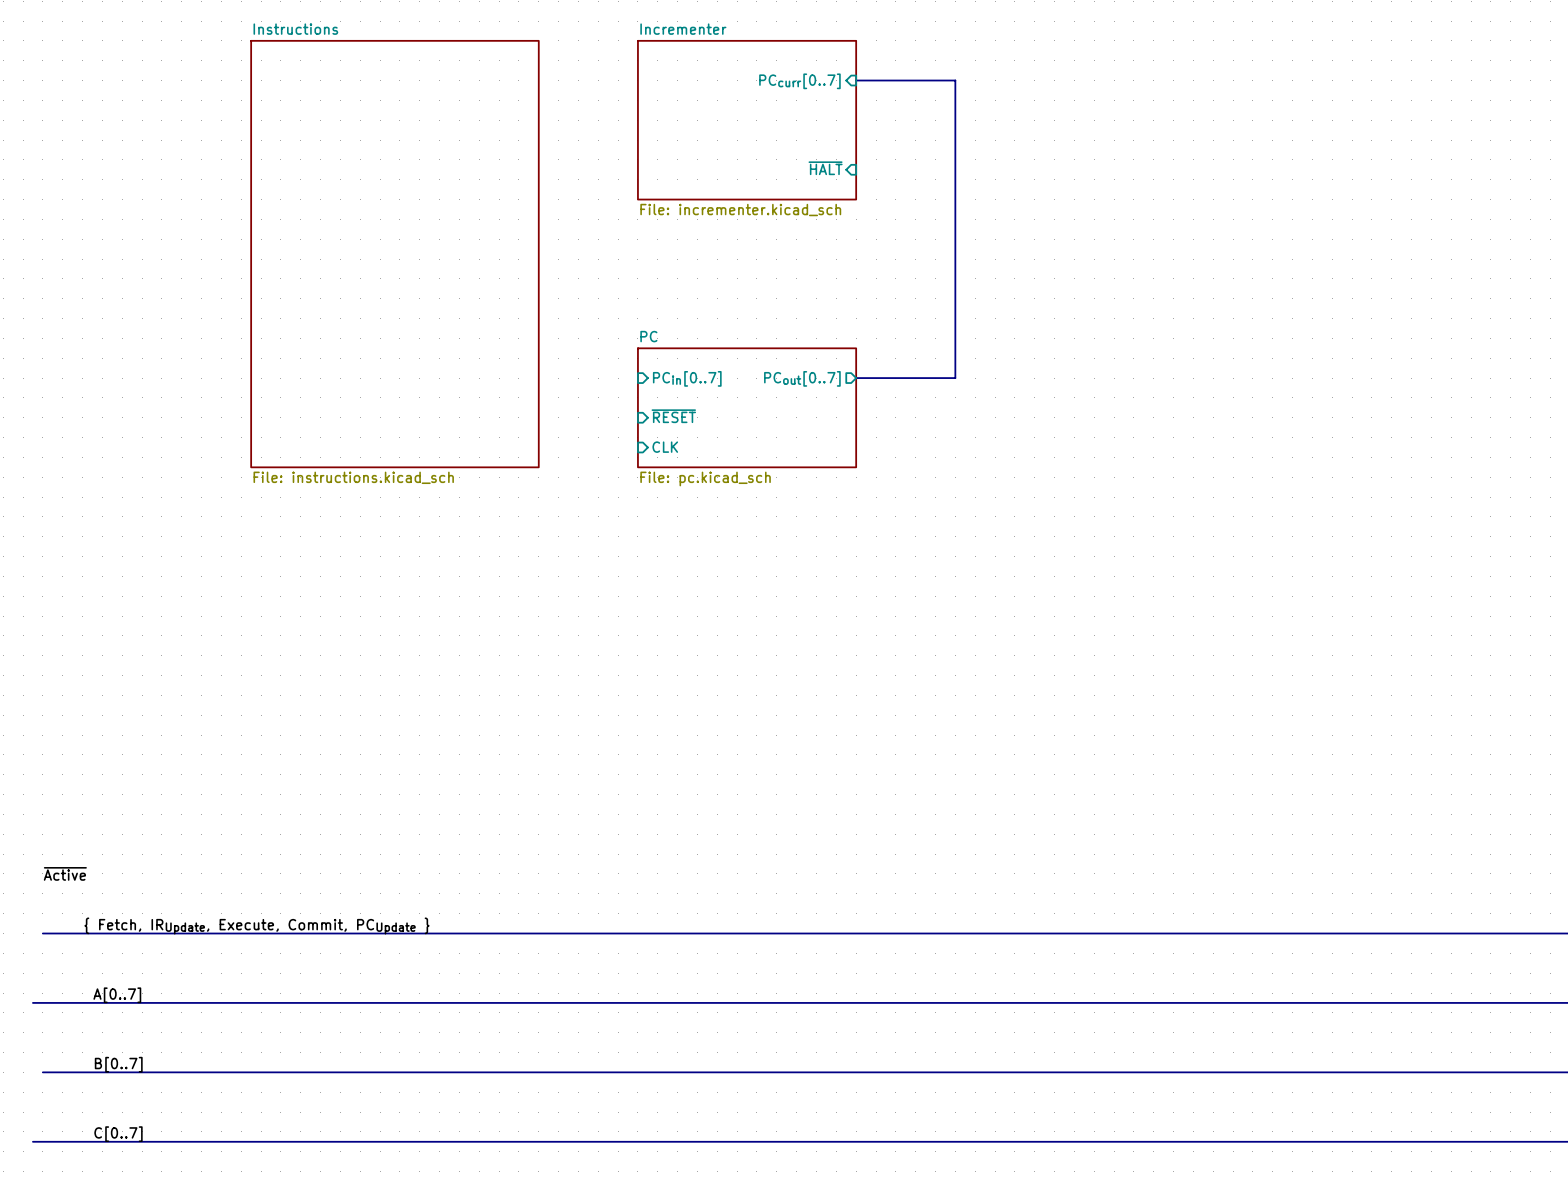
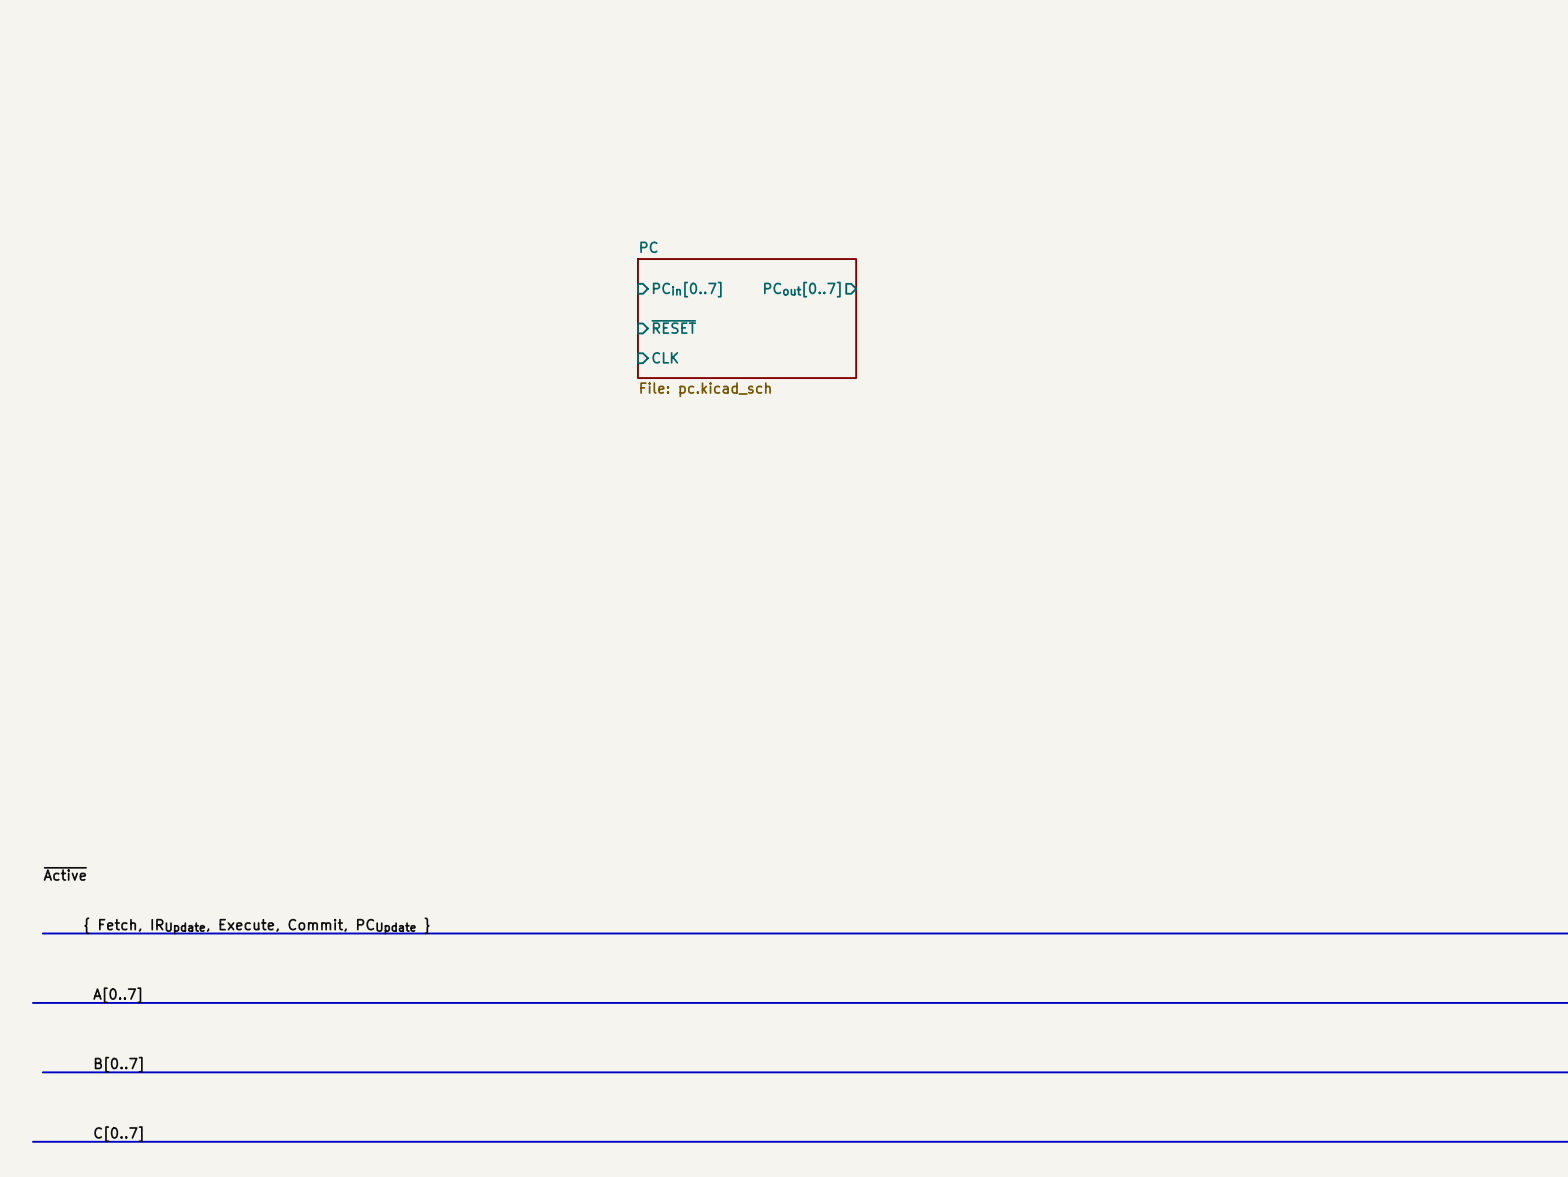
bus: (856, 80) (955, 80) (955, 378) (856, 378) -> none
sheet pin: PCcurr[0..7] (799, 81) -> none
sheet Incrementer: File: incrementer.kicad_sch (747, 120) -> none
sheet pin: ~{HALT} (825, 168) -> none
sheet Instructions: File: instructions.kicad_sch (394, 254) -> none
sheet pin position: PCin[0..7] (687, 378) -> PCin[0..7] (687, 289)
sheet pin position: PCout[0..7] (802, 378) -> PCout[0..7] (802, 289)
sheet PC position: (747, 407) -> (747, 318)
sheet pin position: ~{RESET} (673, 416) -> ~{RESET} (673, 326)
sheet pin position: CLK (665, 447) -> CLK (665, 357)

